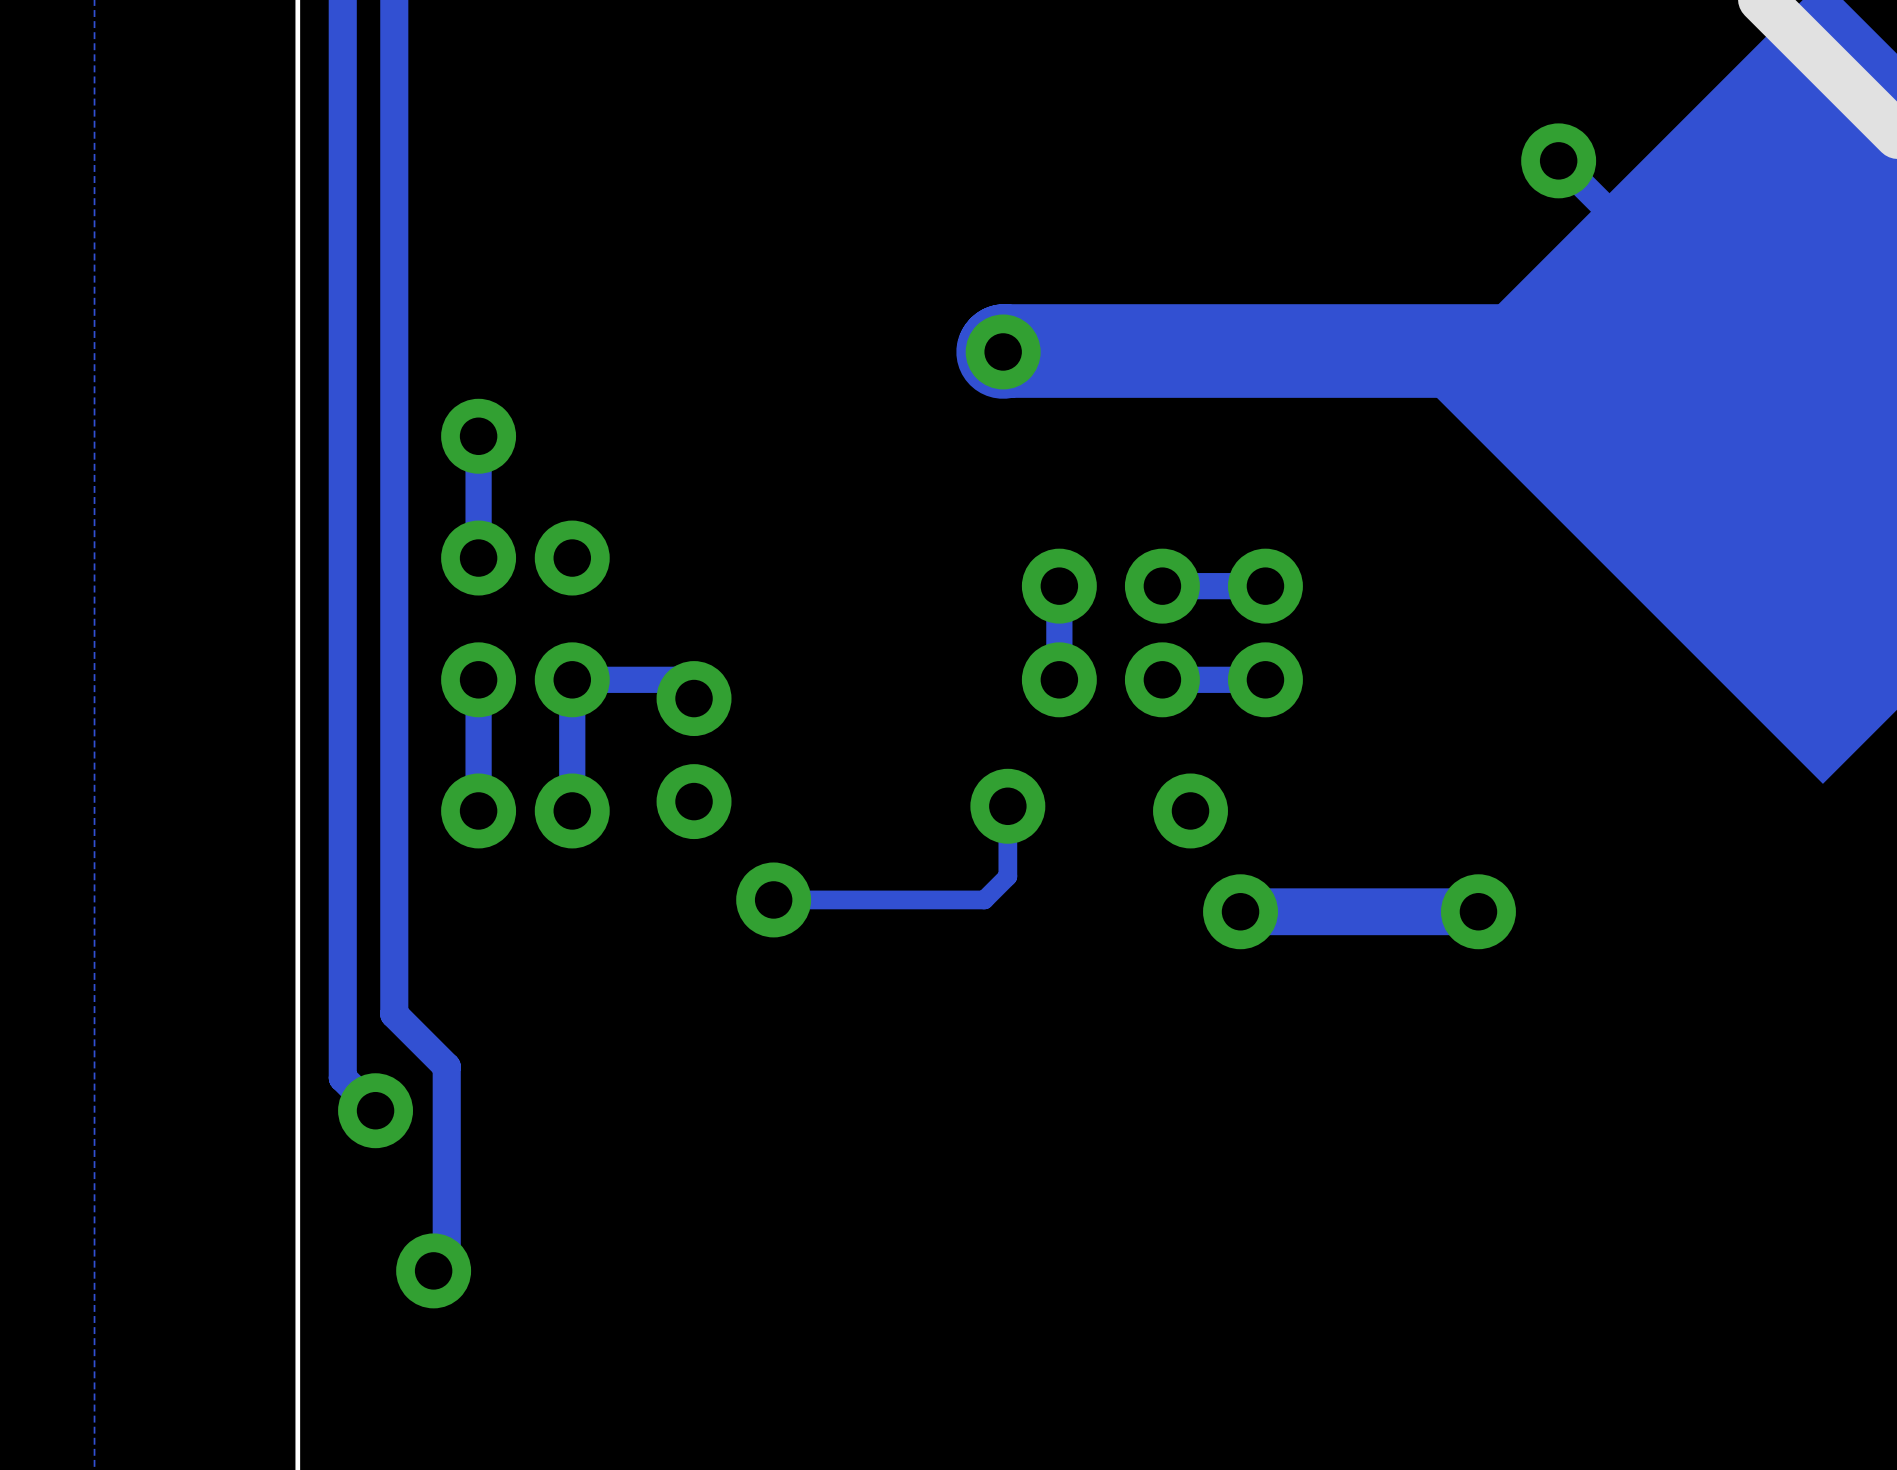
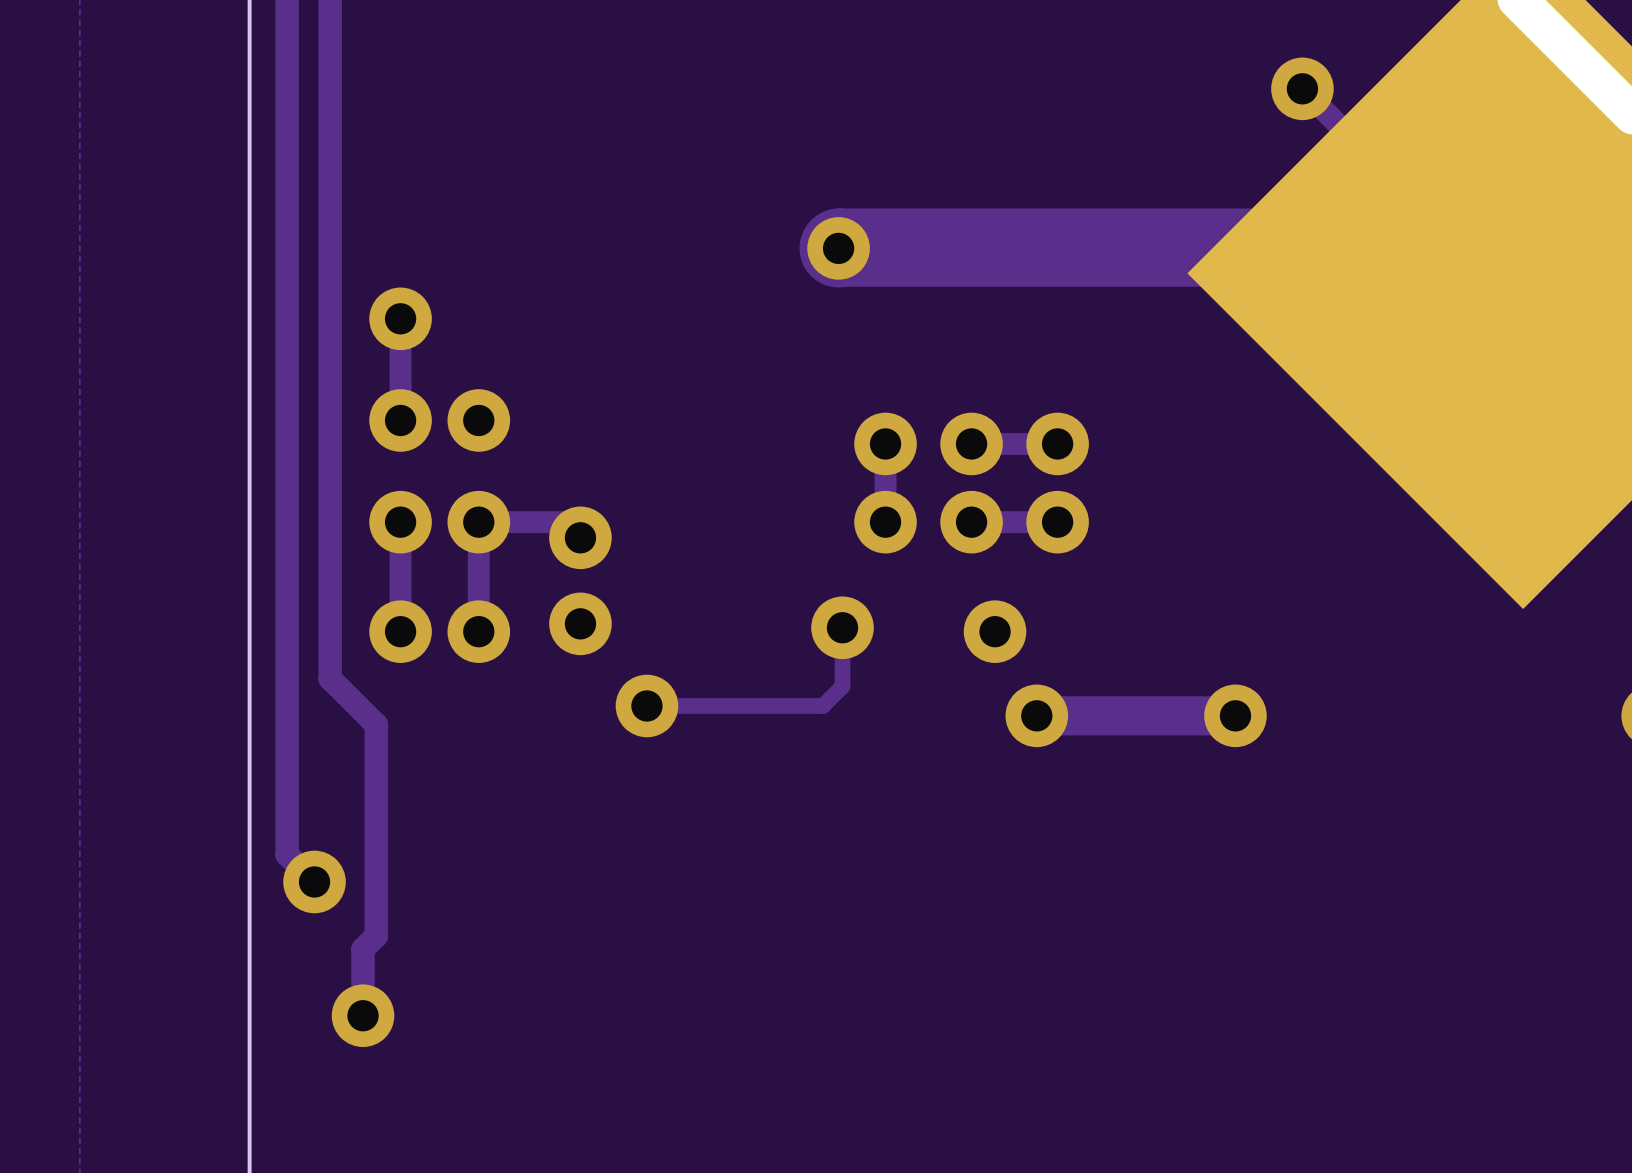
track: (394, 867) (394, 1014) (446, 1066) (446, 1257) (433, 1270) -> (330, 678) (376, 724) (376, 935) (363, 949) (363, 1015)

